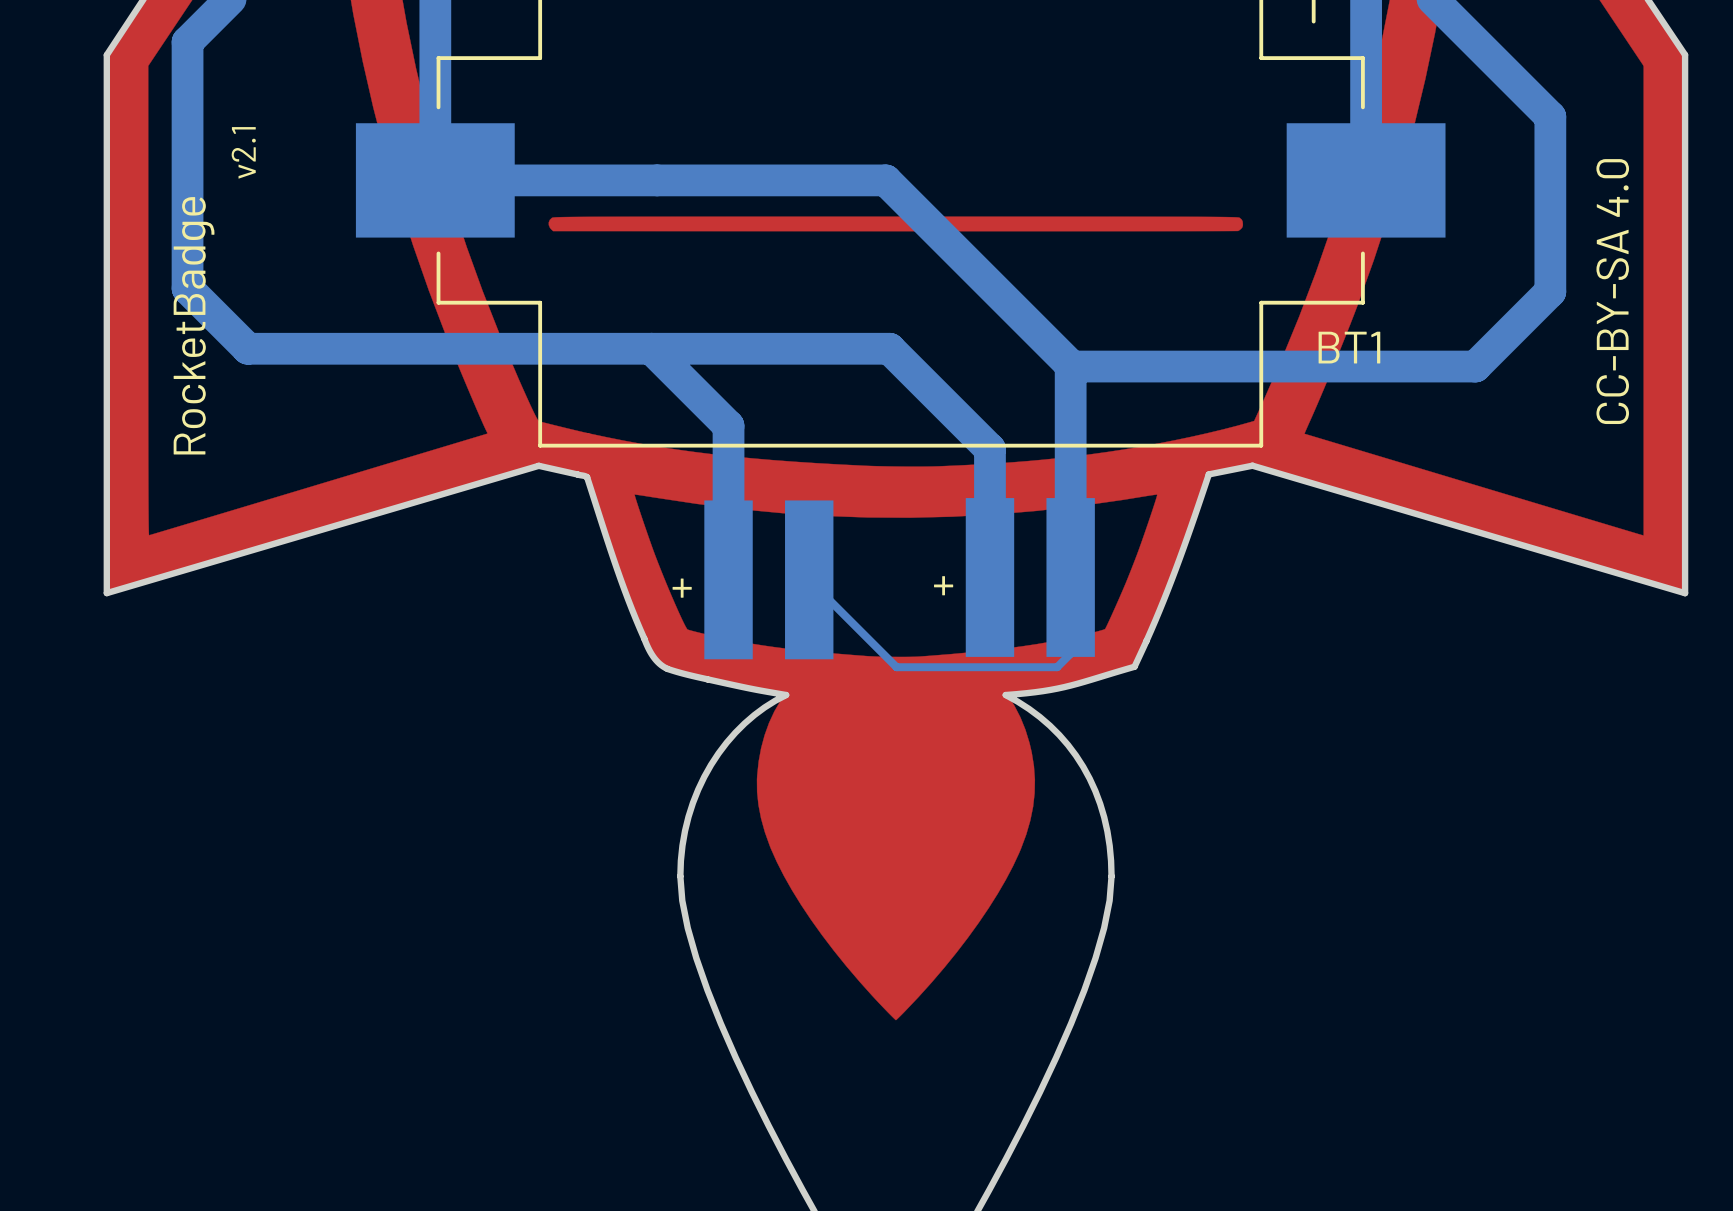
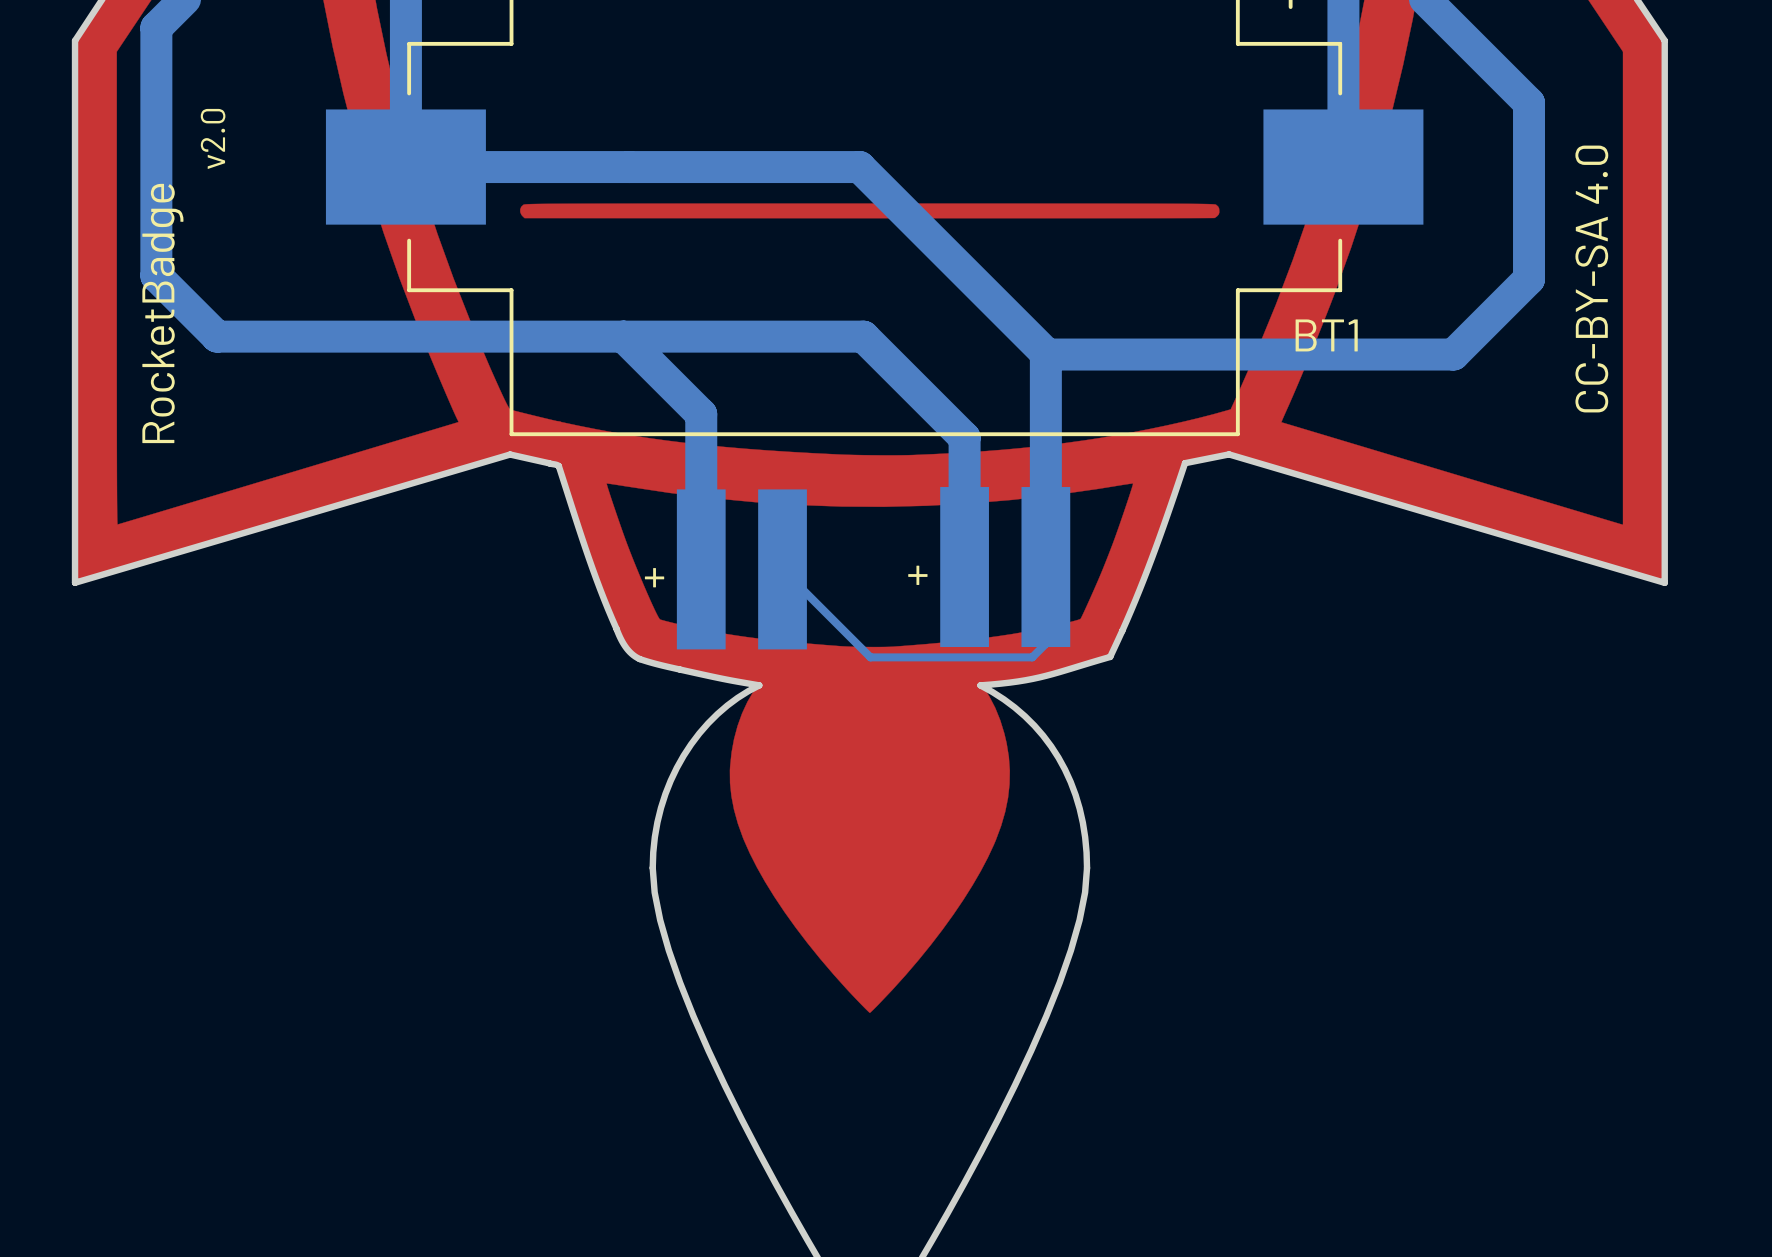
text: v2.1 (243, 152) -> v2.0 (213, 138)

